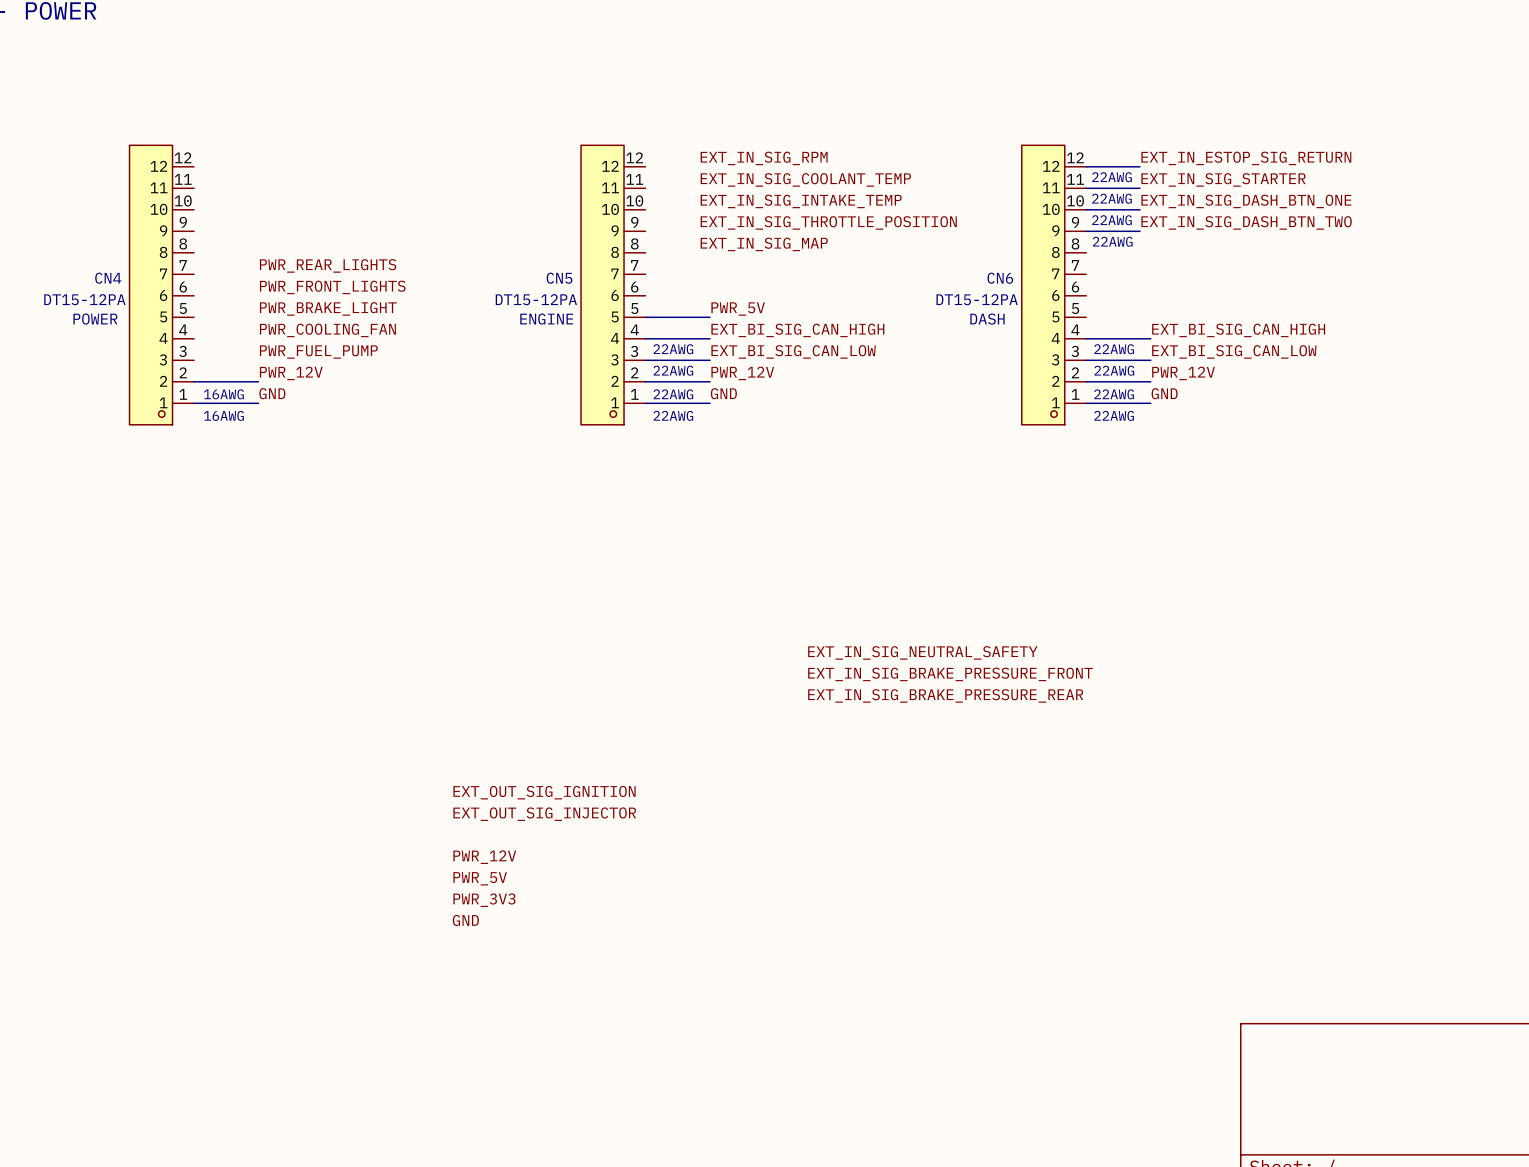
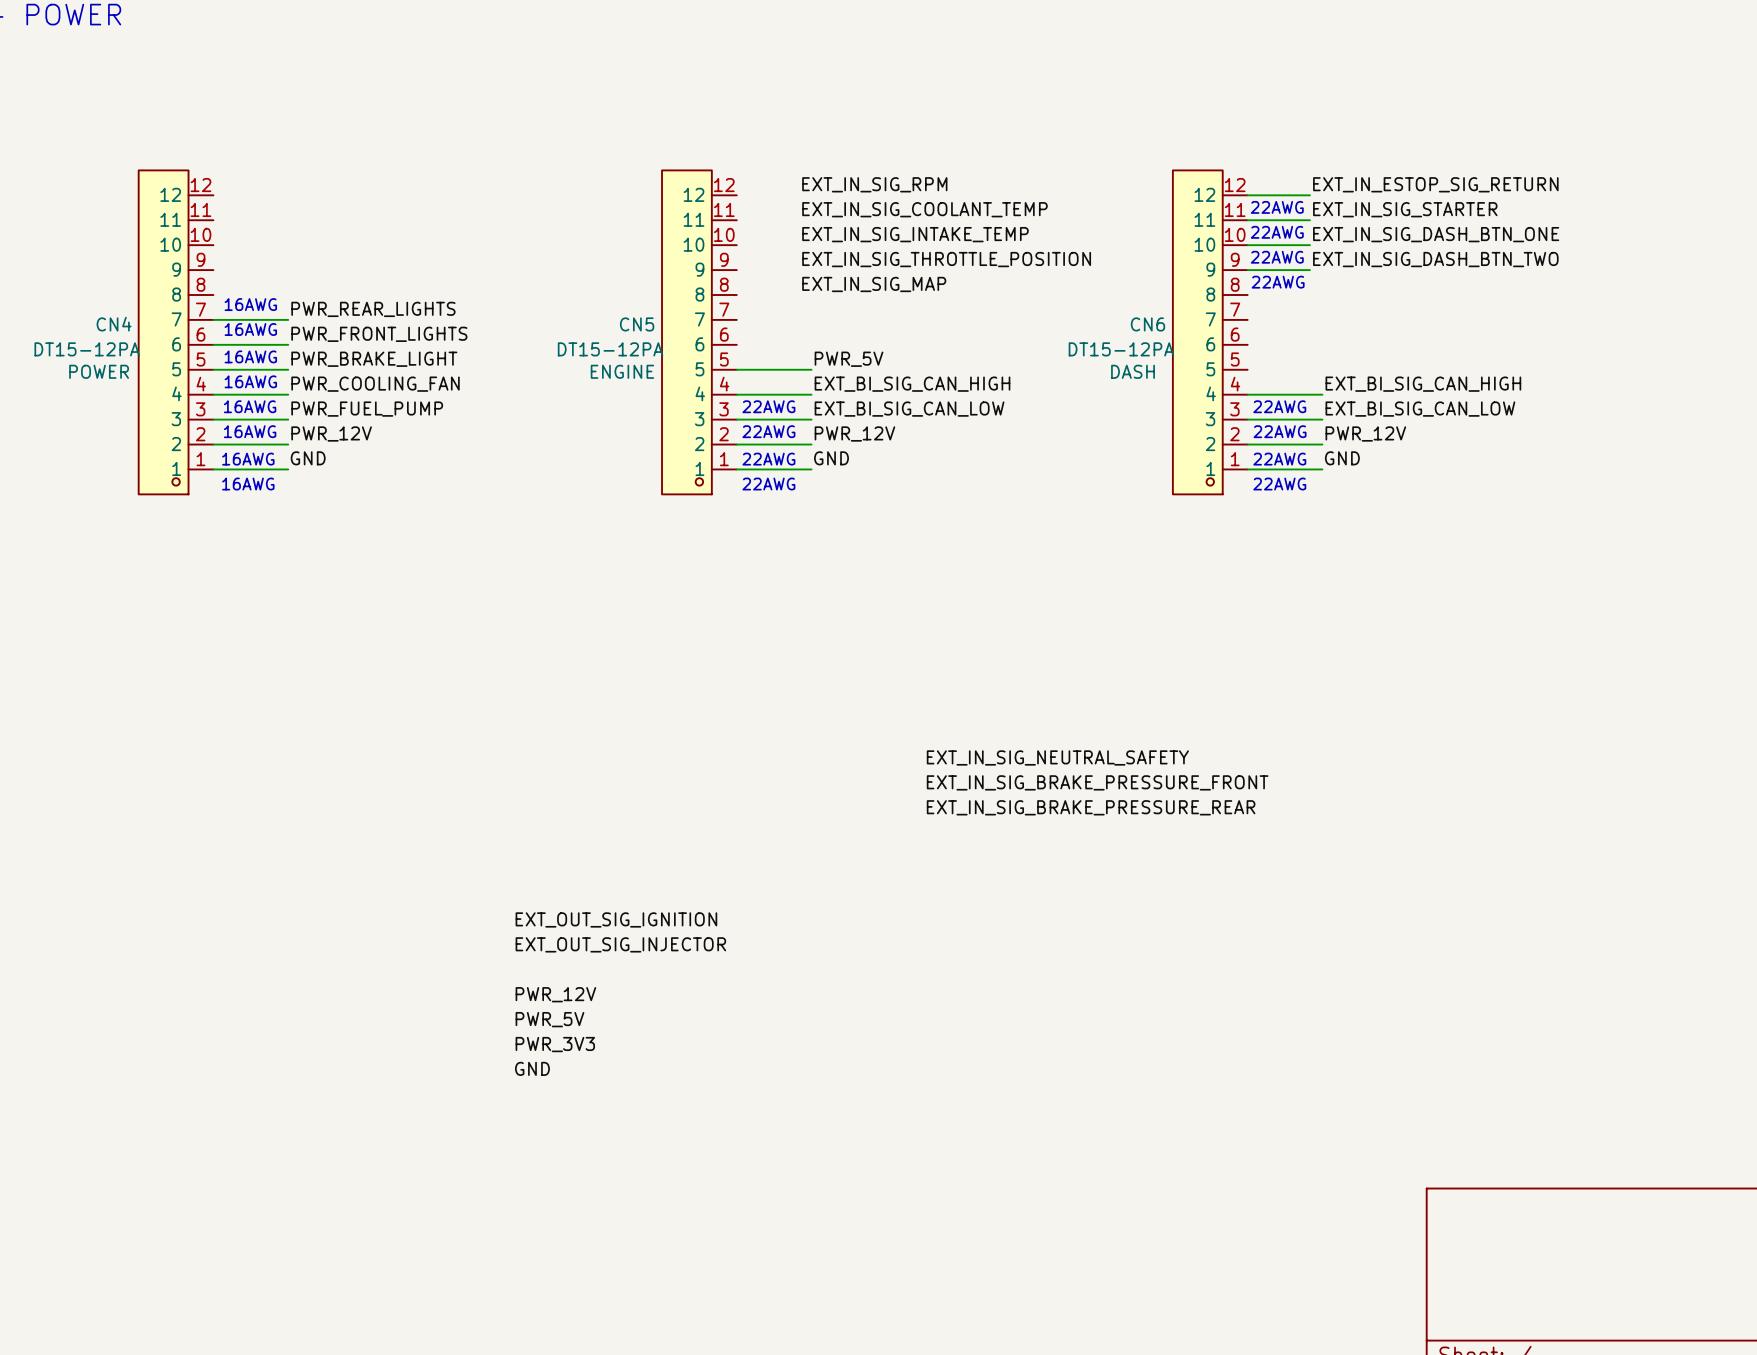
text: none -> 16AWG (250, 304)
wire: none -> (213, 319) (288, 319)
text: none -> 16AWG (250, 329)
wire: none -> (213, 344) (288, 344)
text: none -> 16AWG (250, 356)
wire: none -> (213, 369) (288, 369)
text: none -> 16AWG (250, 381)
wire: none -> (213, 394) (288, 394)
text: none -> 16AWG (250, 406)
wire: none -> (213, 419) (288, 419)
text: none -> 16AWG (250, 431)

